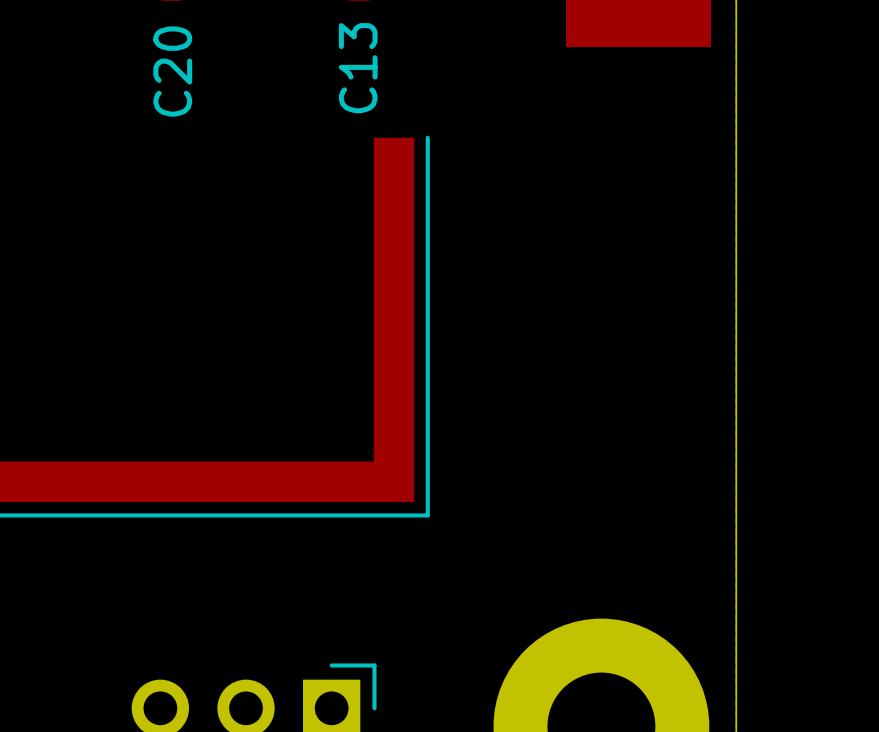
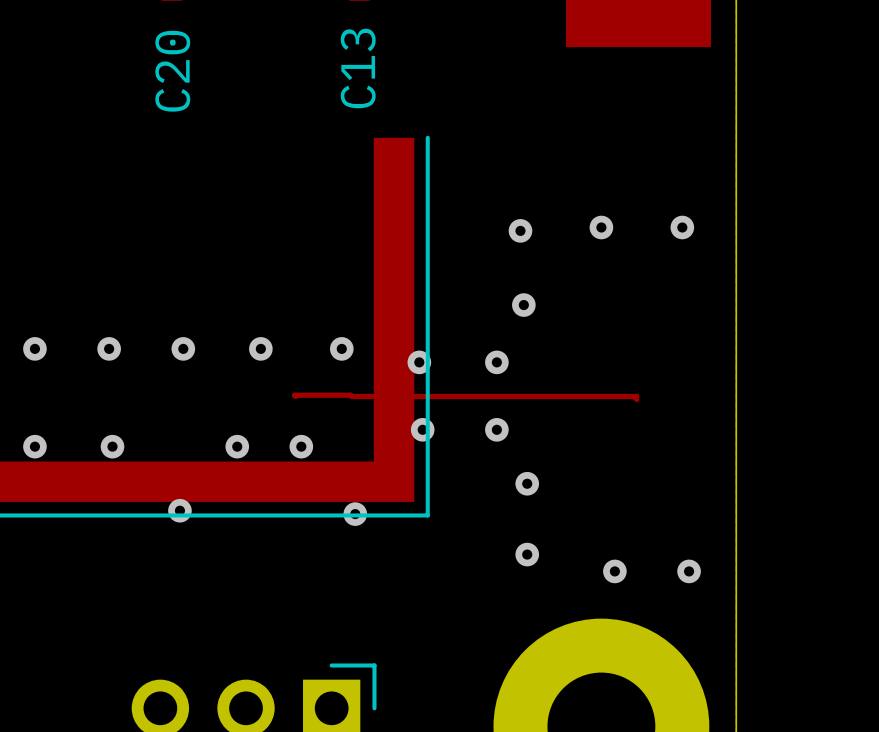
via: none -> (601, 227)
via: none -> (682, 227)
via: none -> (520, 230)
via: none -> (523, 305)
via: none -> (34, 348)
via: none -> (109, 348)
via: none -> (183, 348)
via: none -> (260, 348)
via: none -> (341, 348)
via: none -> (419, 362)
via: none -> (496, 362)
top track: none -> (295, 396) (294, 395) (636, 396)
top track: none -> (634, 397) (636, 399)
via: none -> (422, 429)
via: none -> (496, 429)
via: none -> (34, 446)
via: none -> (112, 446)
via: none -> (237, 446)
via: none -> (301, 446)
via: none -> (527, 483)
via: none -> (179, 510)
via: none -> (355, 514)
via: none -> (527, 554)
via: none -> (614, 571)
via: none -> (689, 571)

